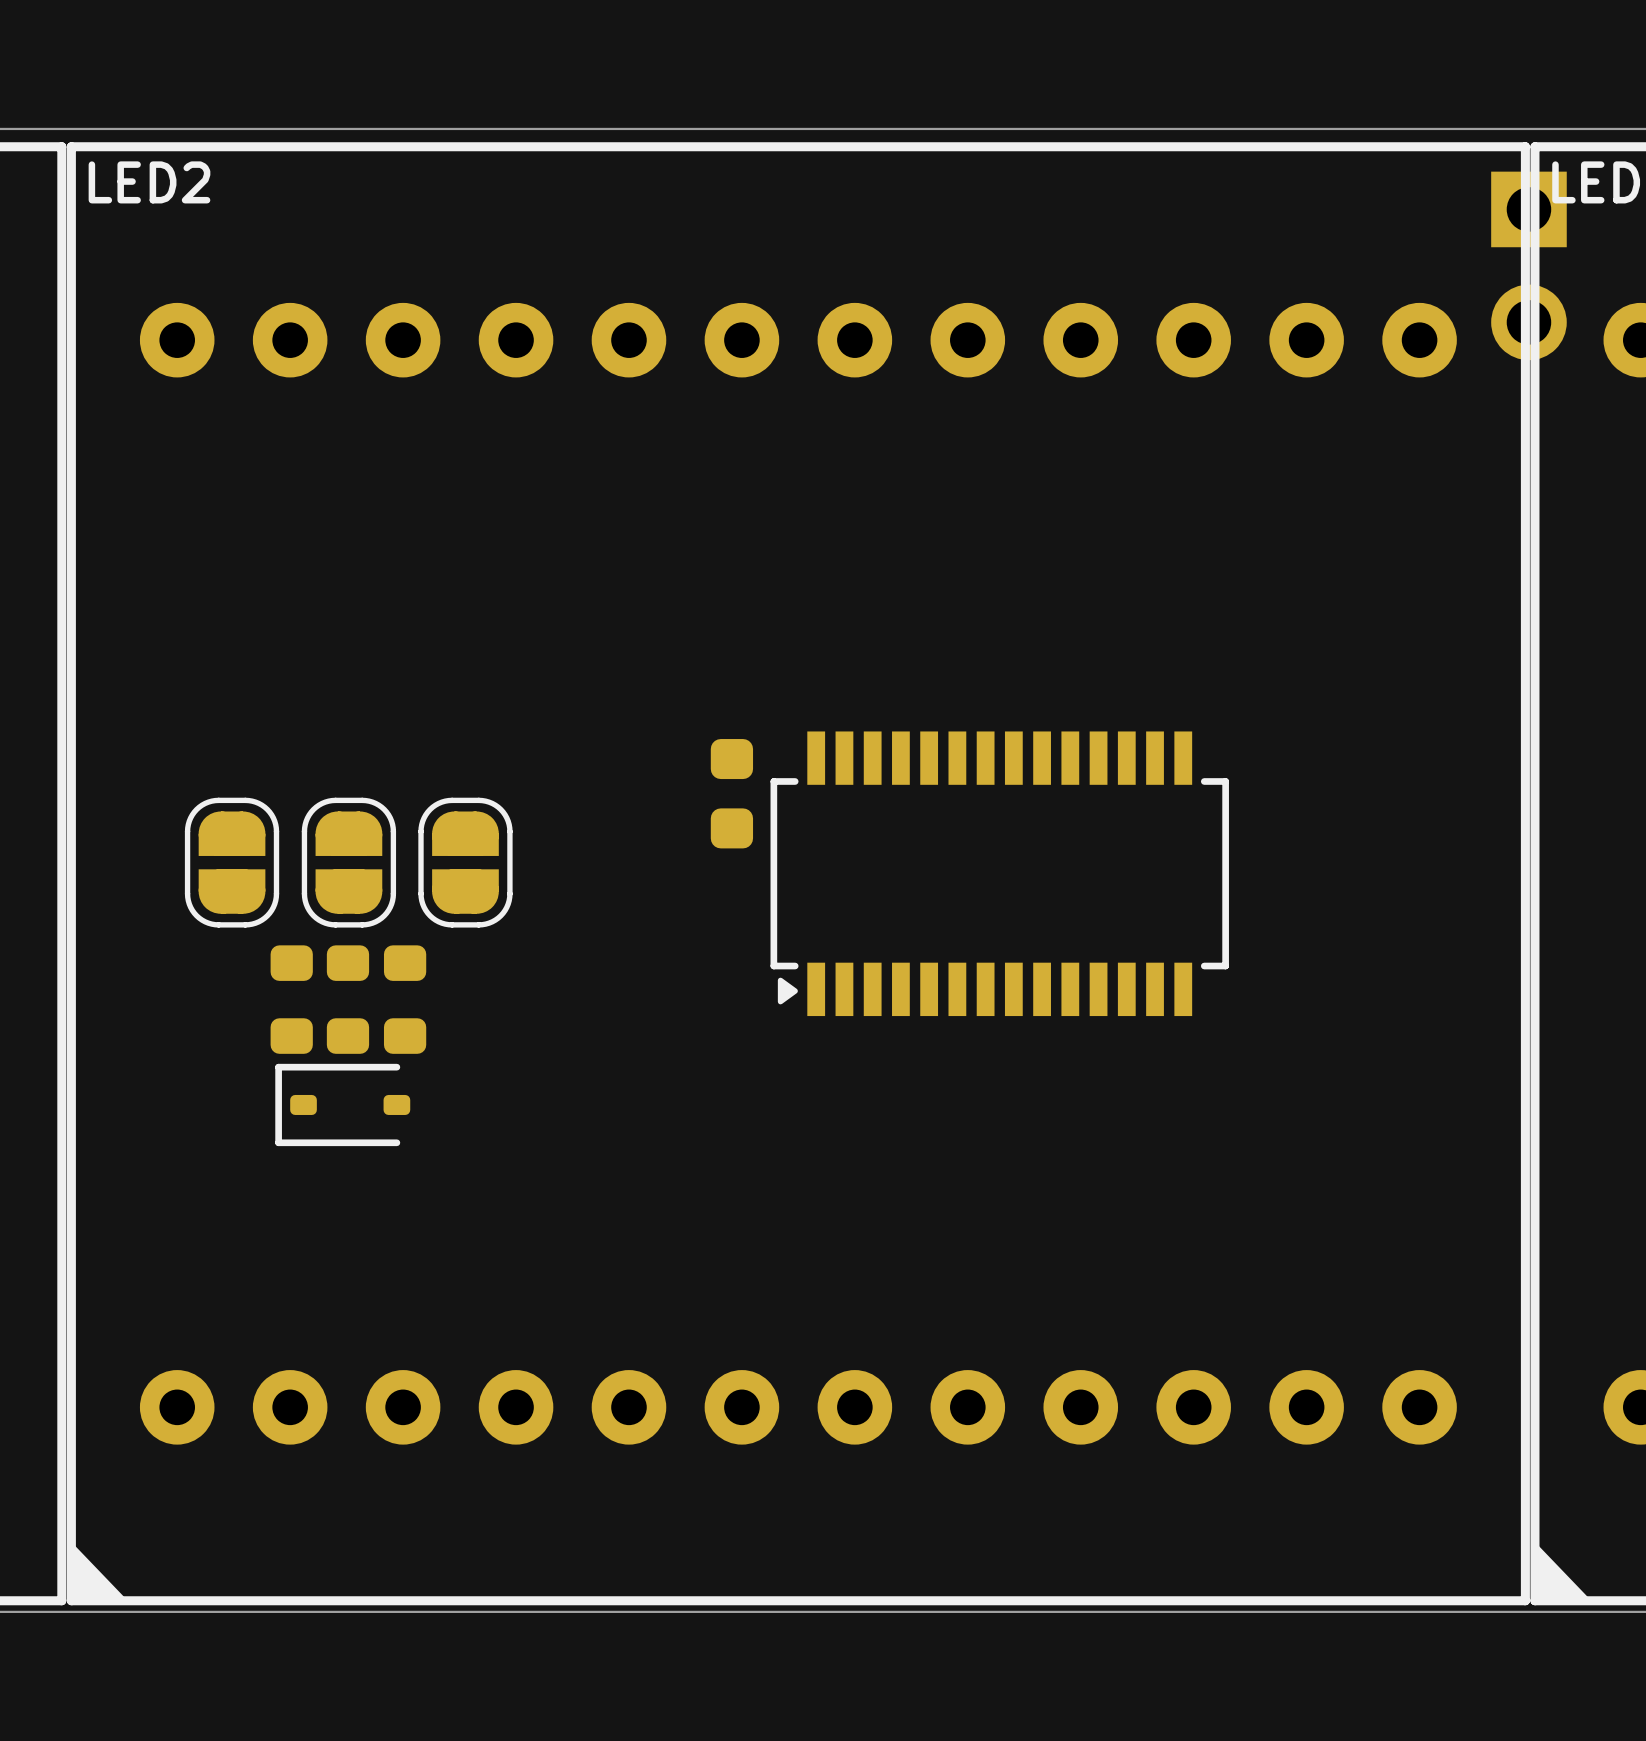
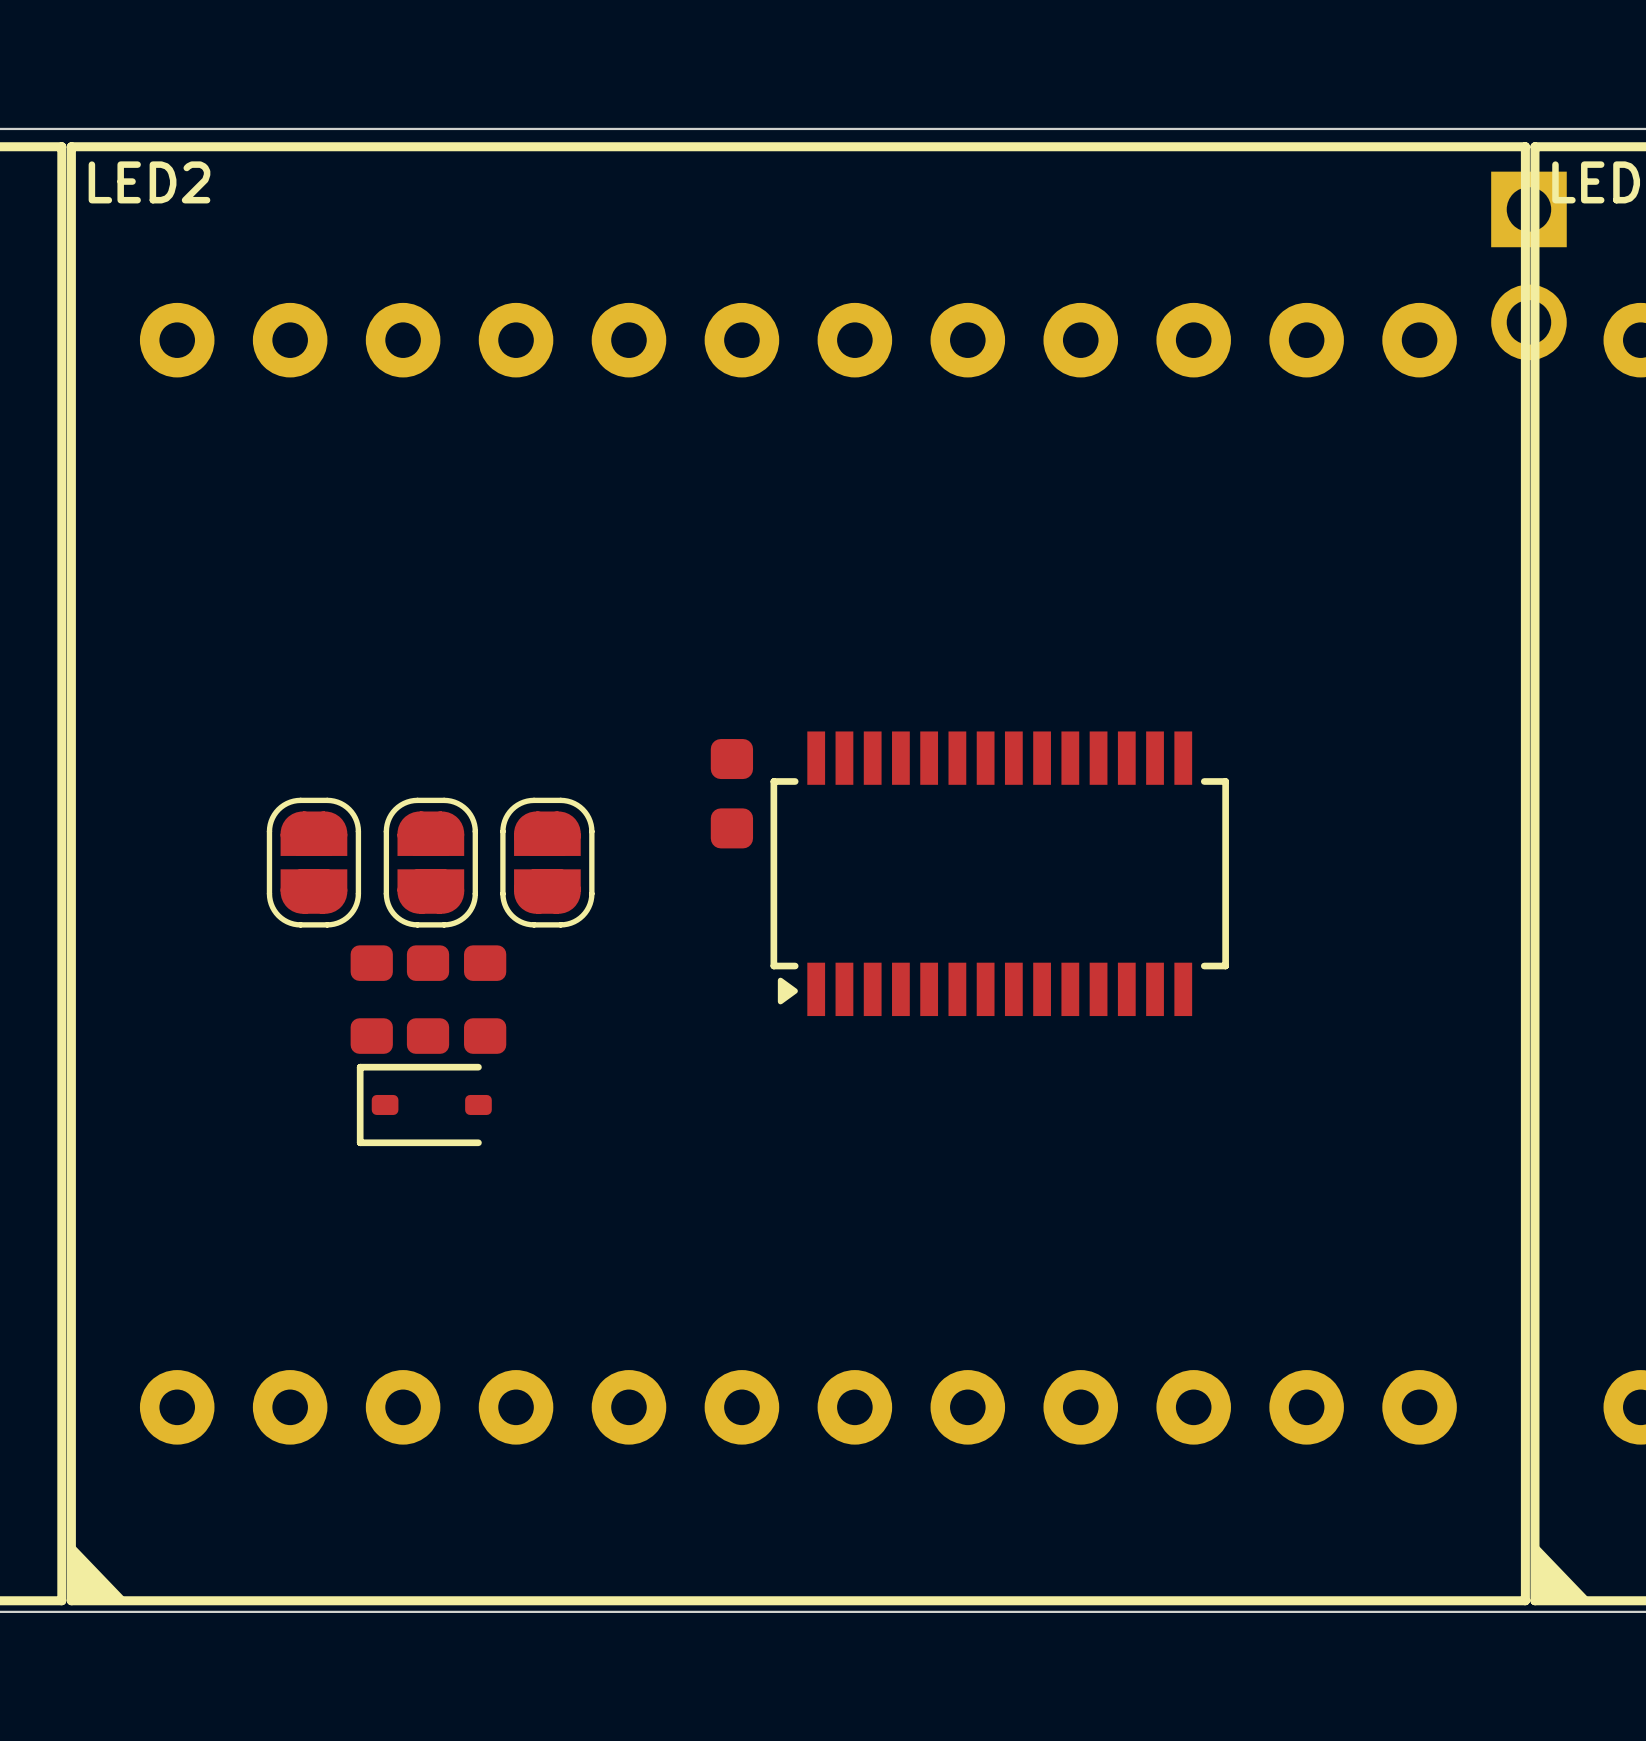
part position: (232, 862) -> (547, 862)
part position: (348, 862) -> (313, 862)
part position: (465, 862) -> (430, 862)
part: (291, 999) -> none
part: (347, 999) -> none
part: none -> (371, 999)
part: (405, 999) -> none
part: none -> (428, 999)
part: none -> (485, 999)
part position: (342, 1104) -> (424, 1104)

